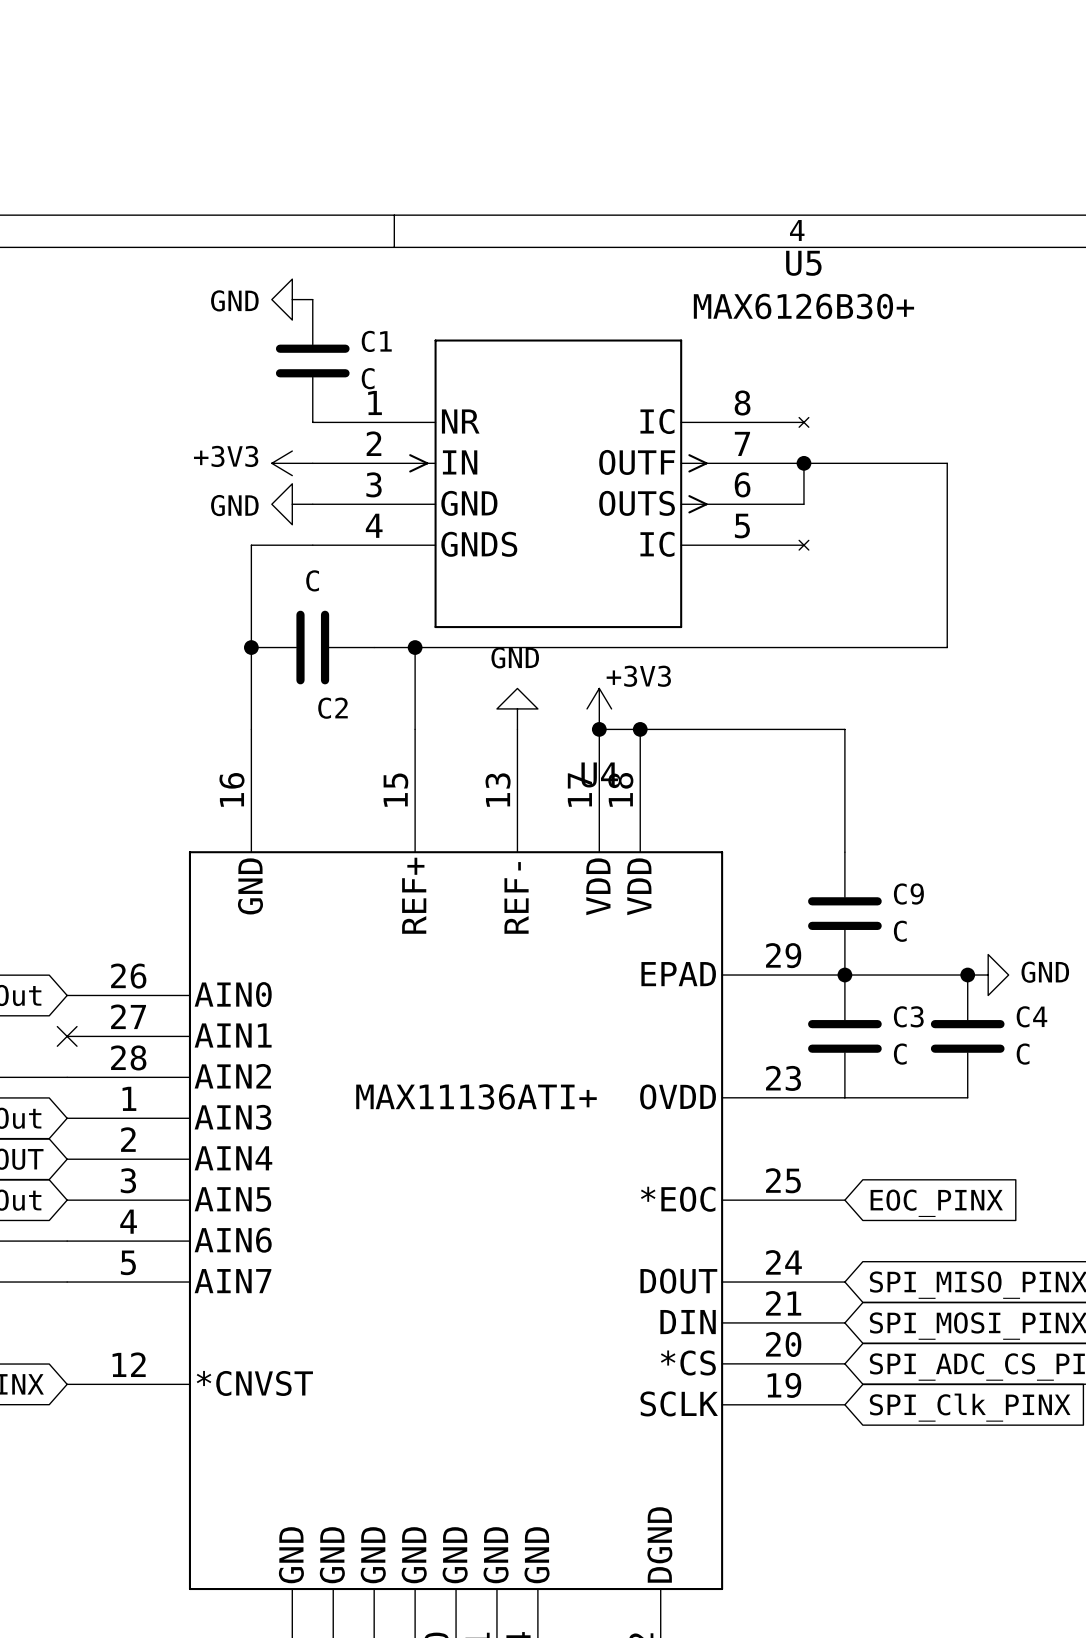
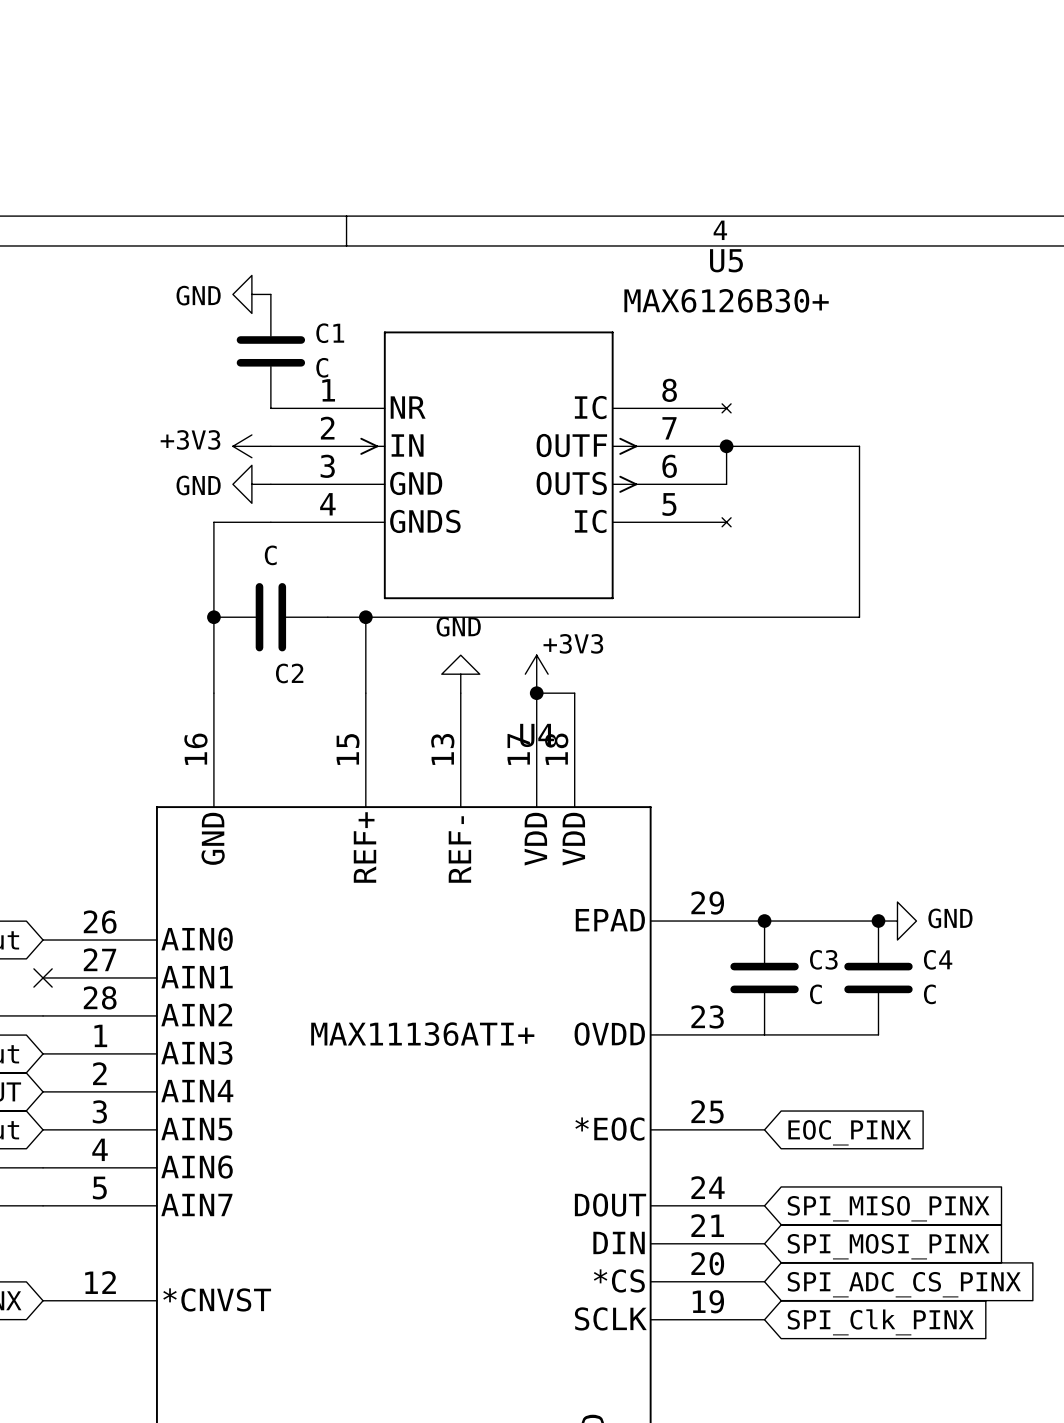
wire: (640, 729) (844, 729) (844, 852) -> none
junction: (640, 729) -> none
C9: C (844, 913) -> none

